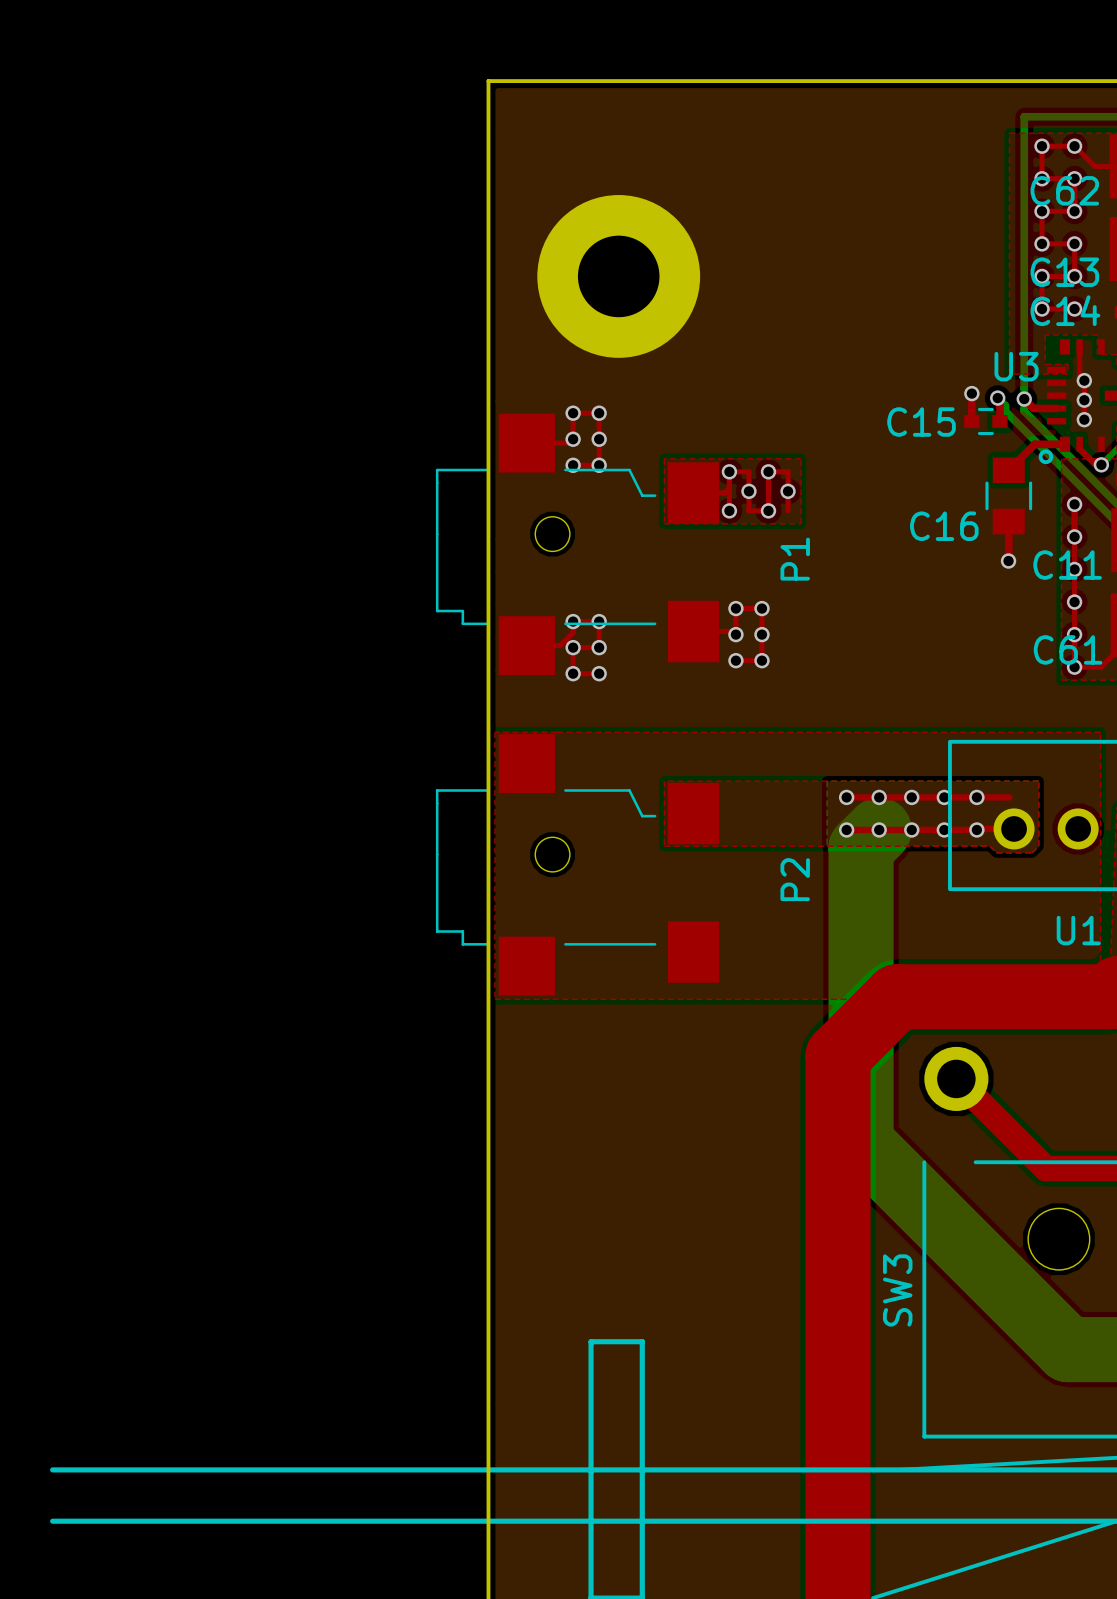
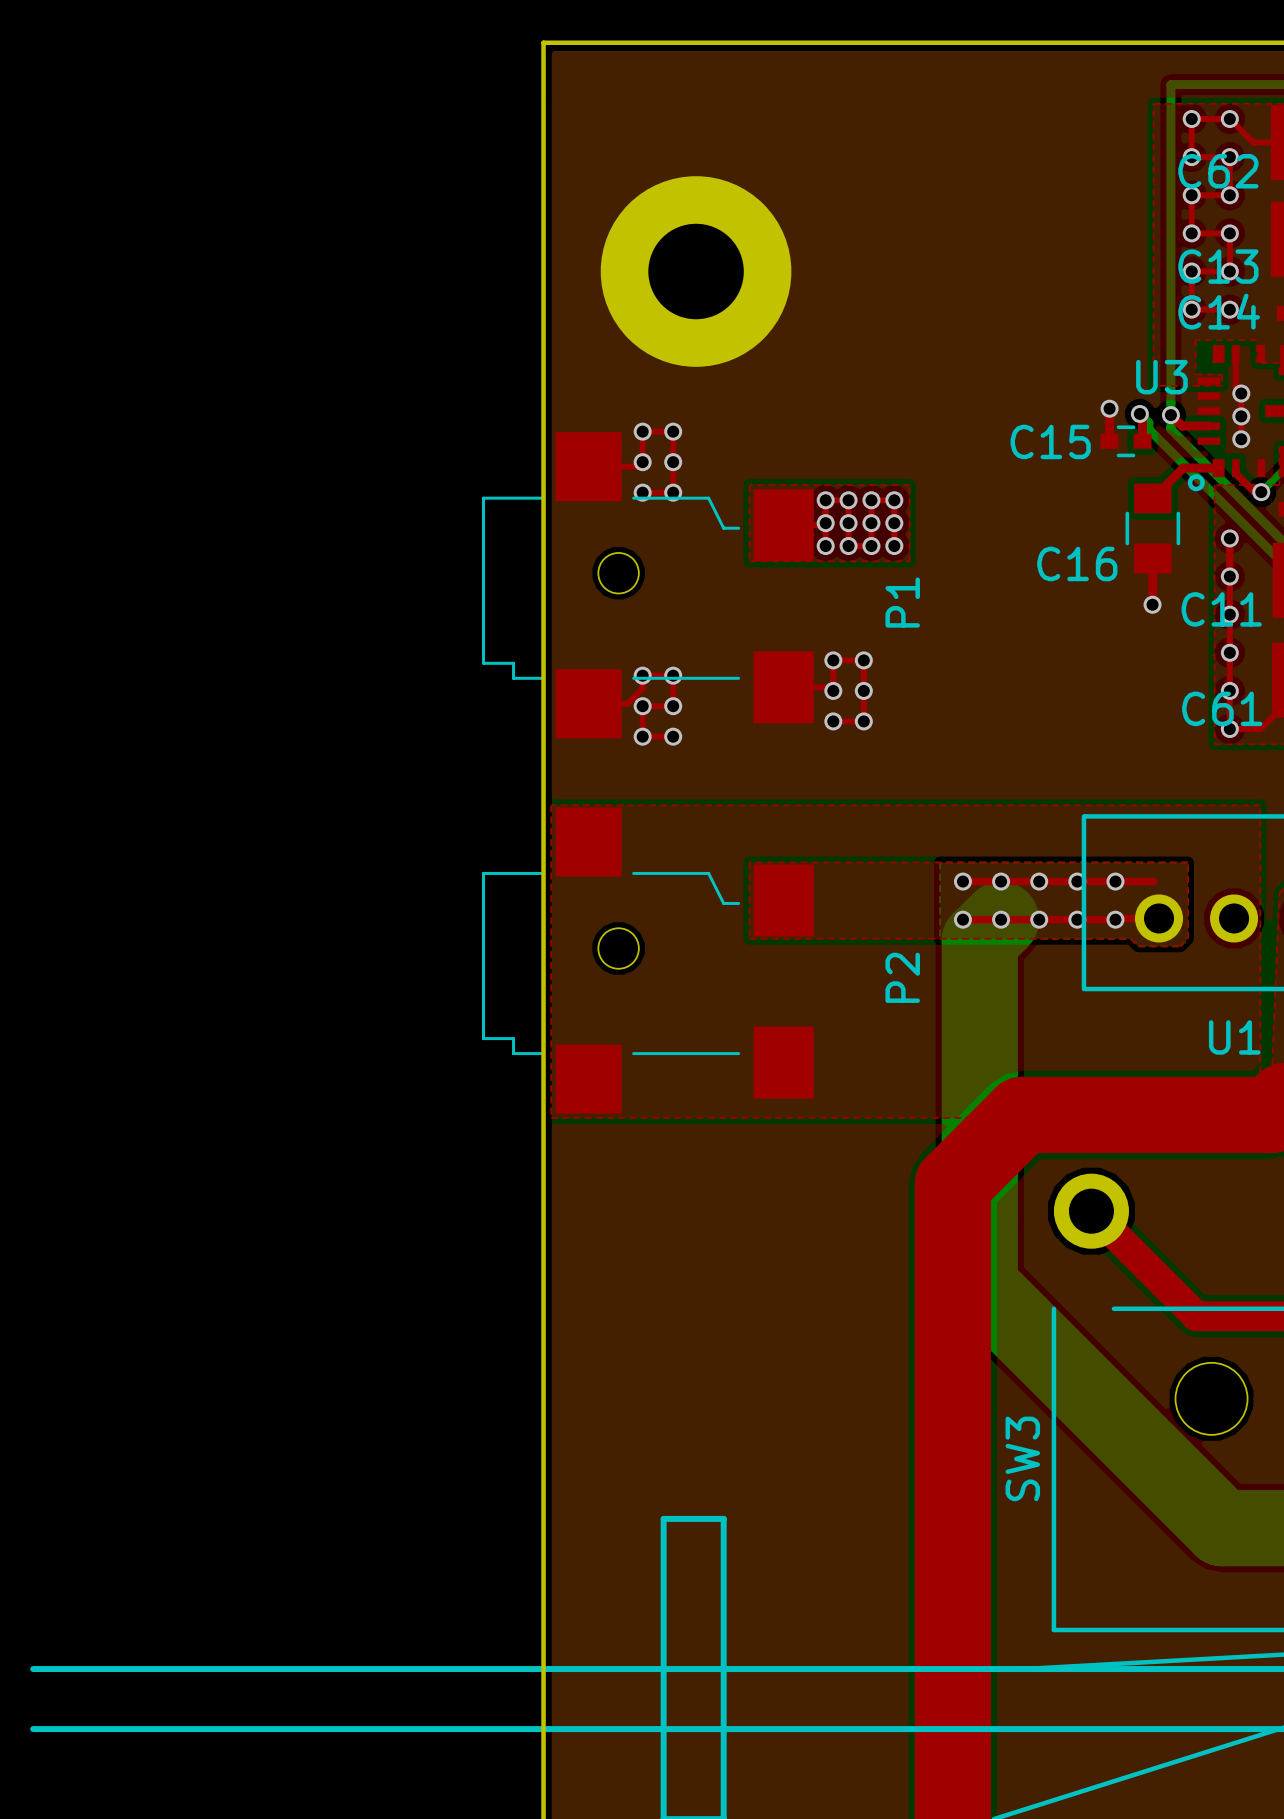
via: none -> (848, 500)
via: none -> (894, 500)
via: none -> (825, 523)
via: none -> (871, 523)
via: none -> (848, 546)
via: none -> (894, 546)

